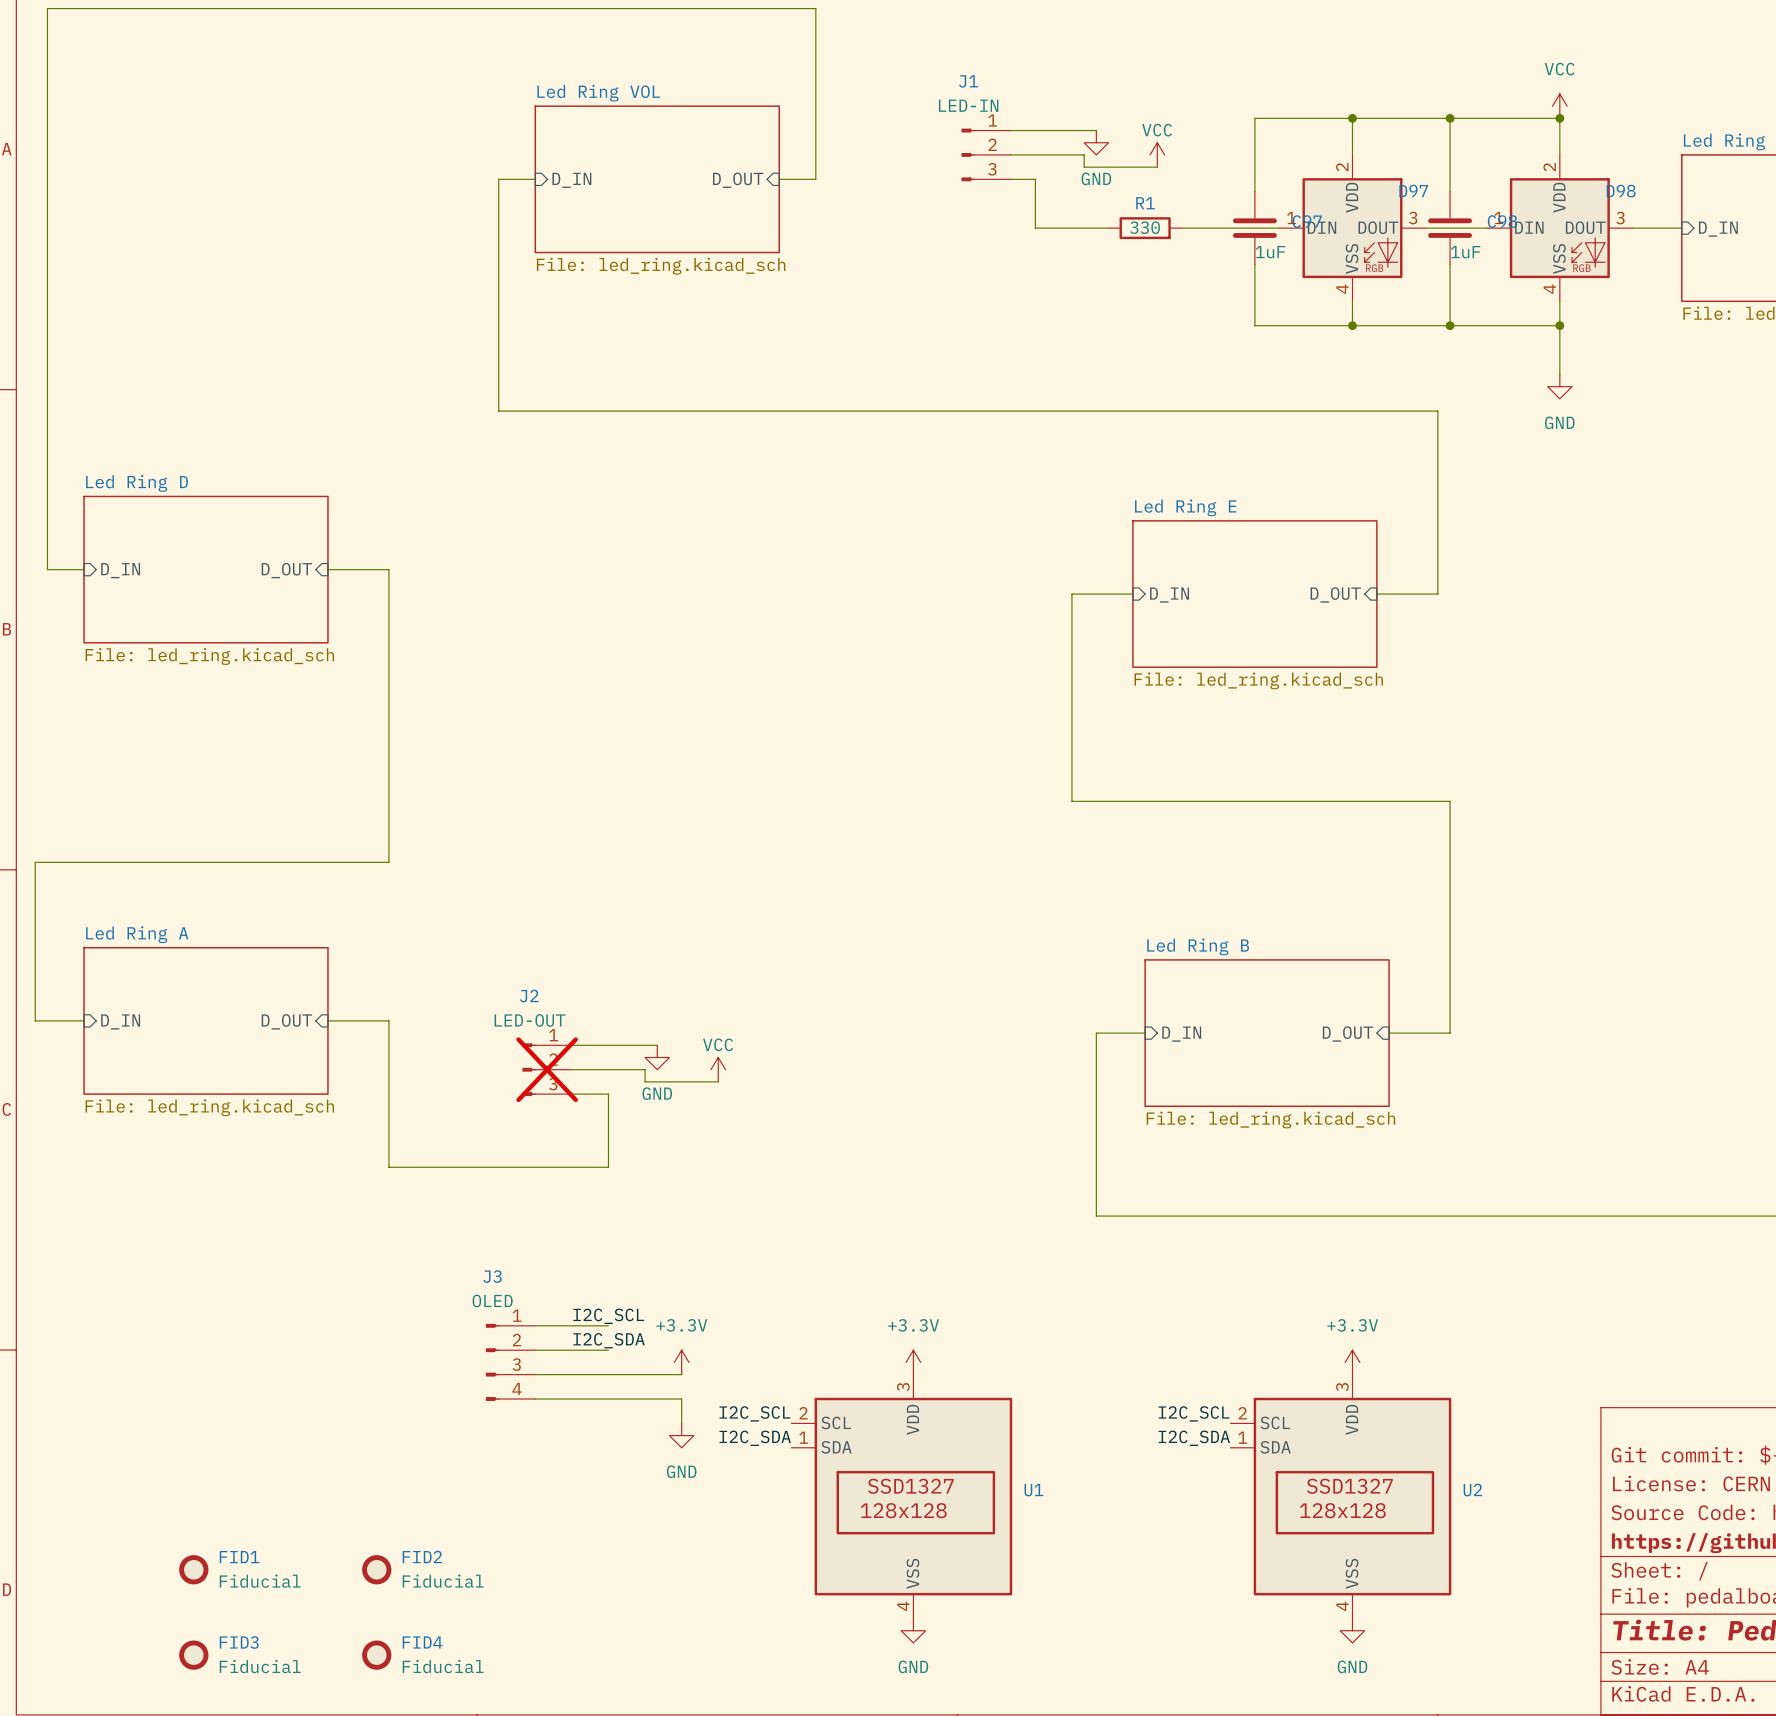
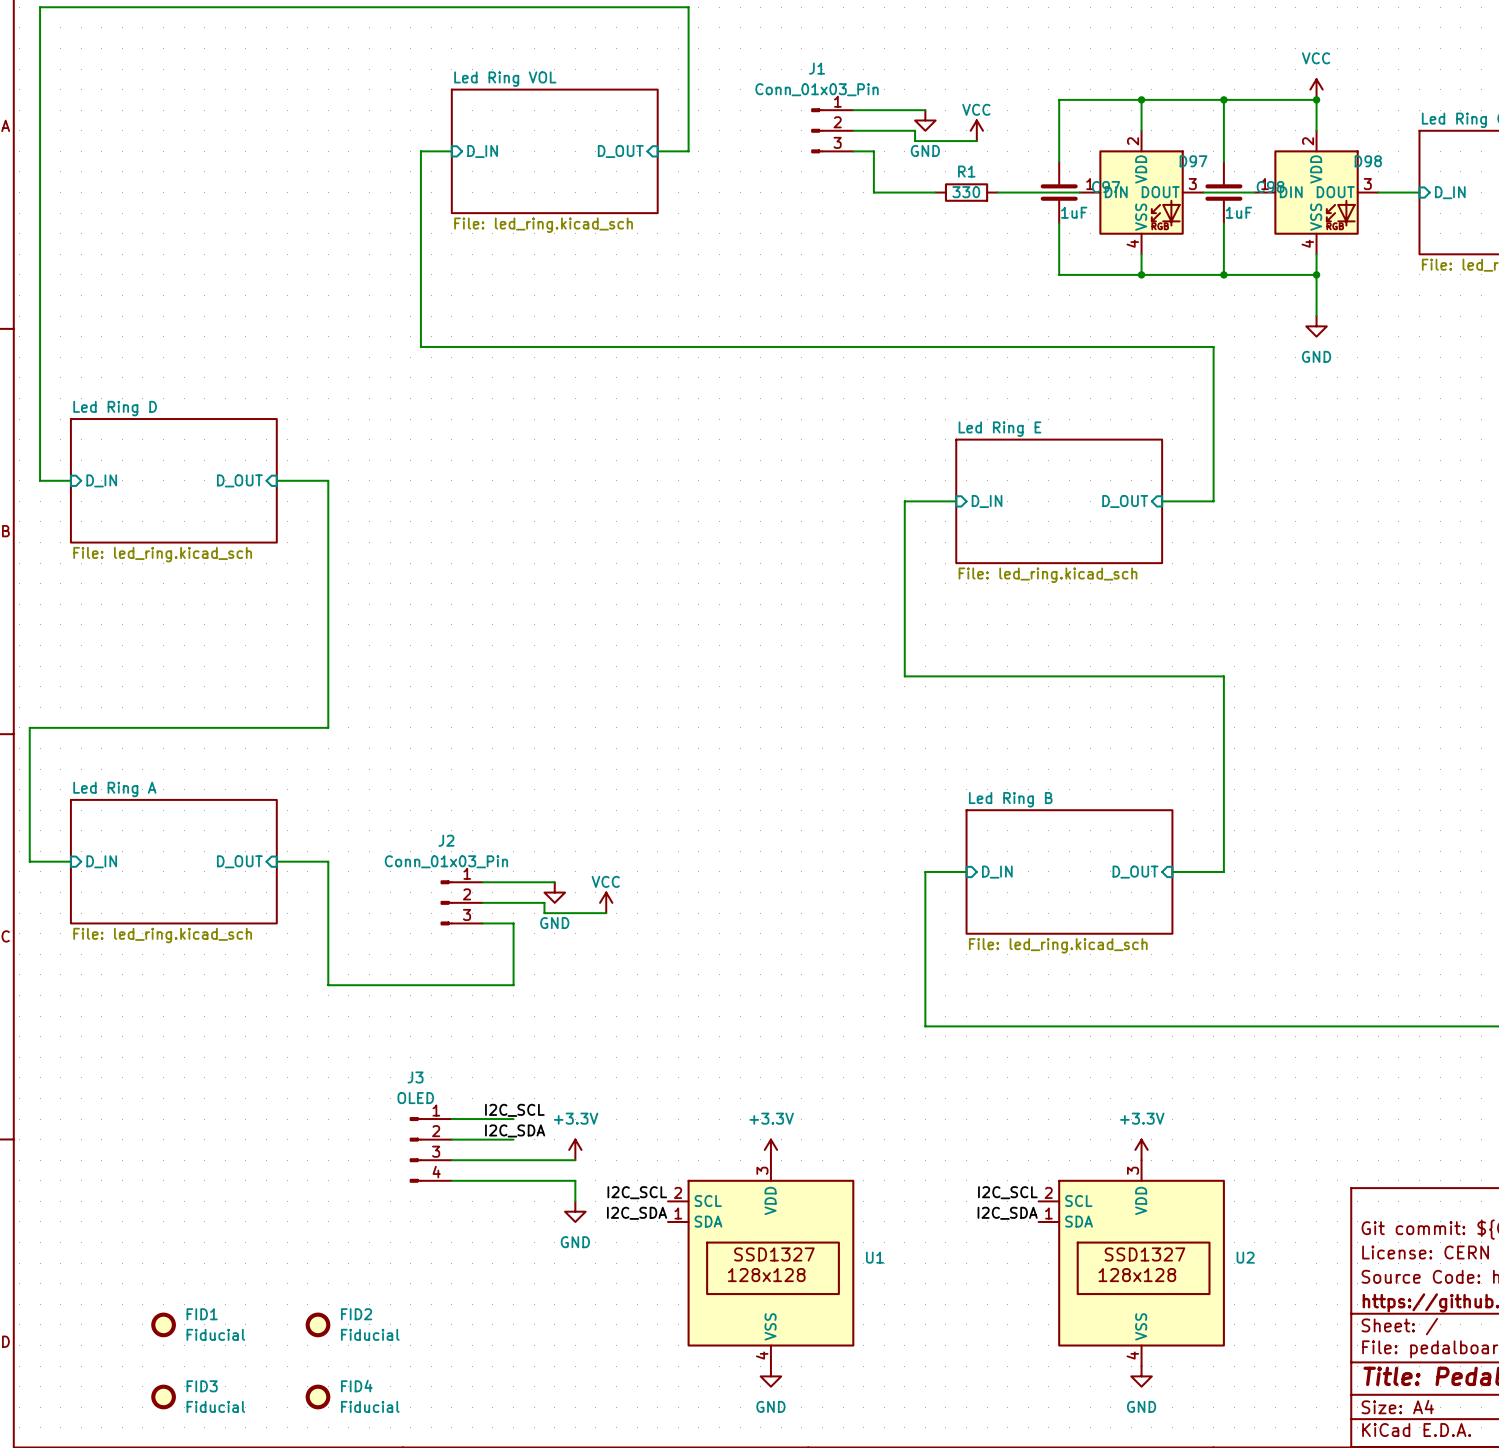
J1 value: LED-IN (968, 105) -> Conn_01x03_Pin (817, 89)
J2 value: LED-OUT (530, 1020) -> Conn_01x03_Pin (446, 861)
J2 do-not-place cross: (547, 1069) -> none

